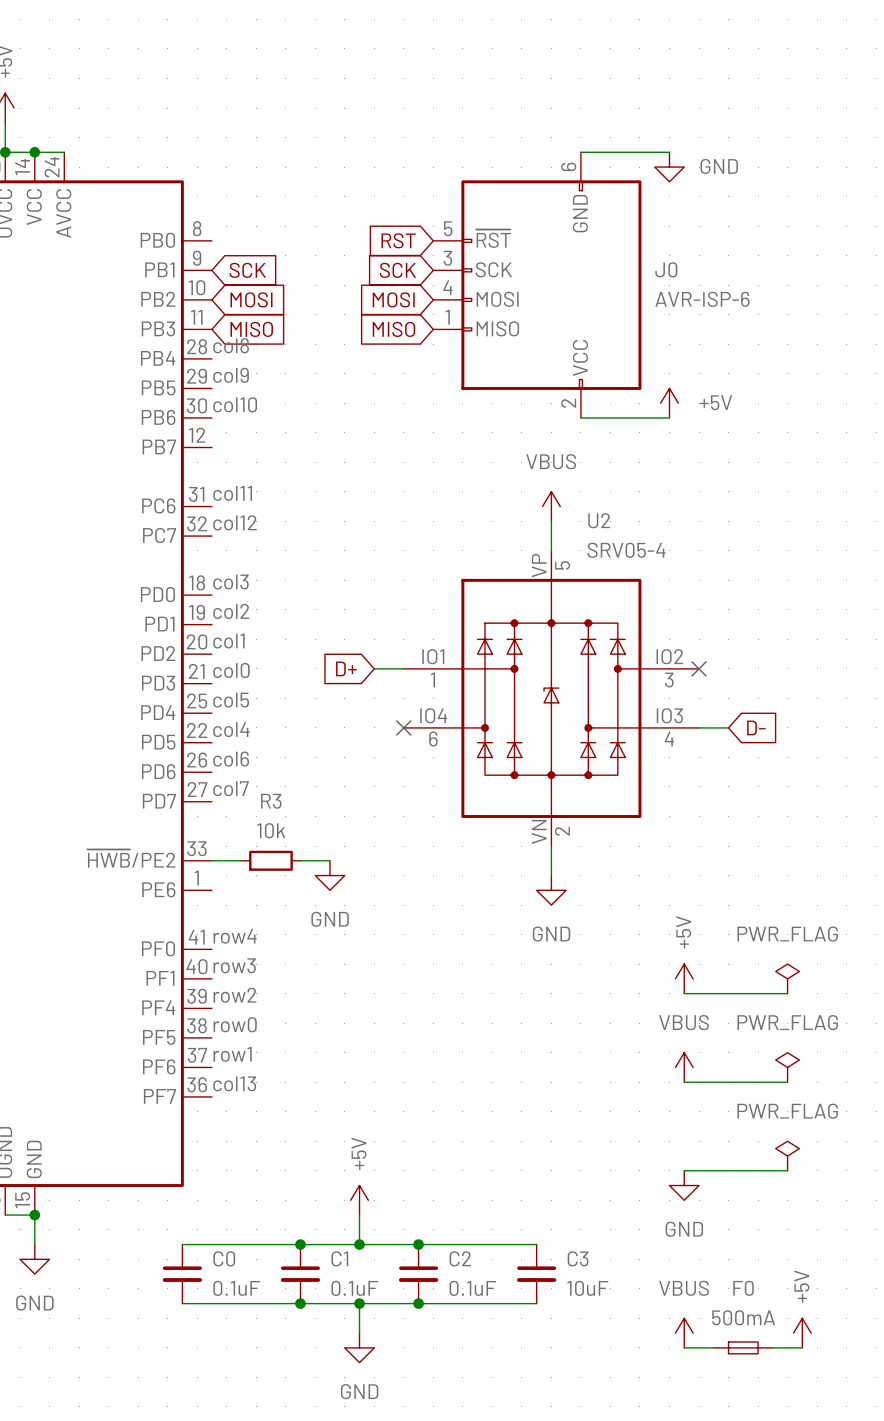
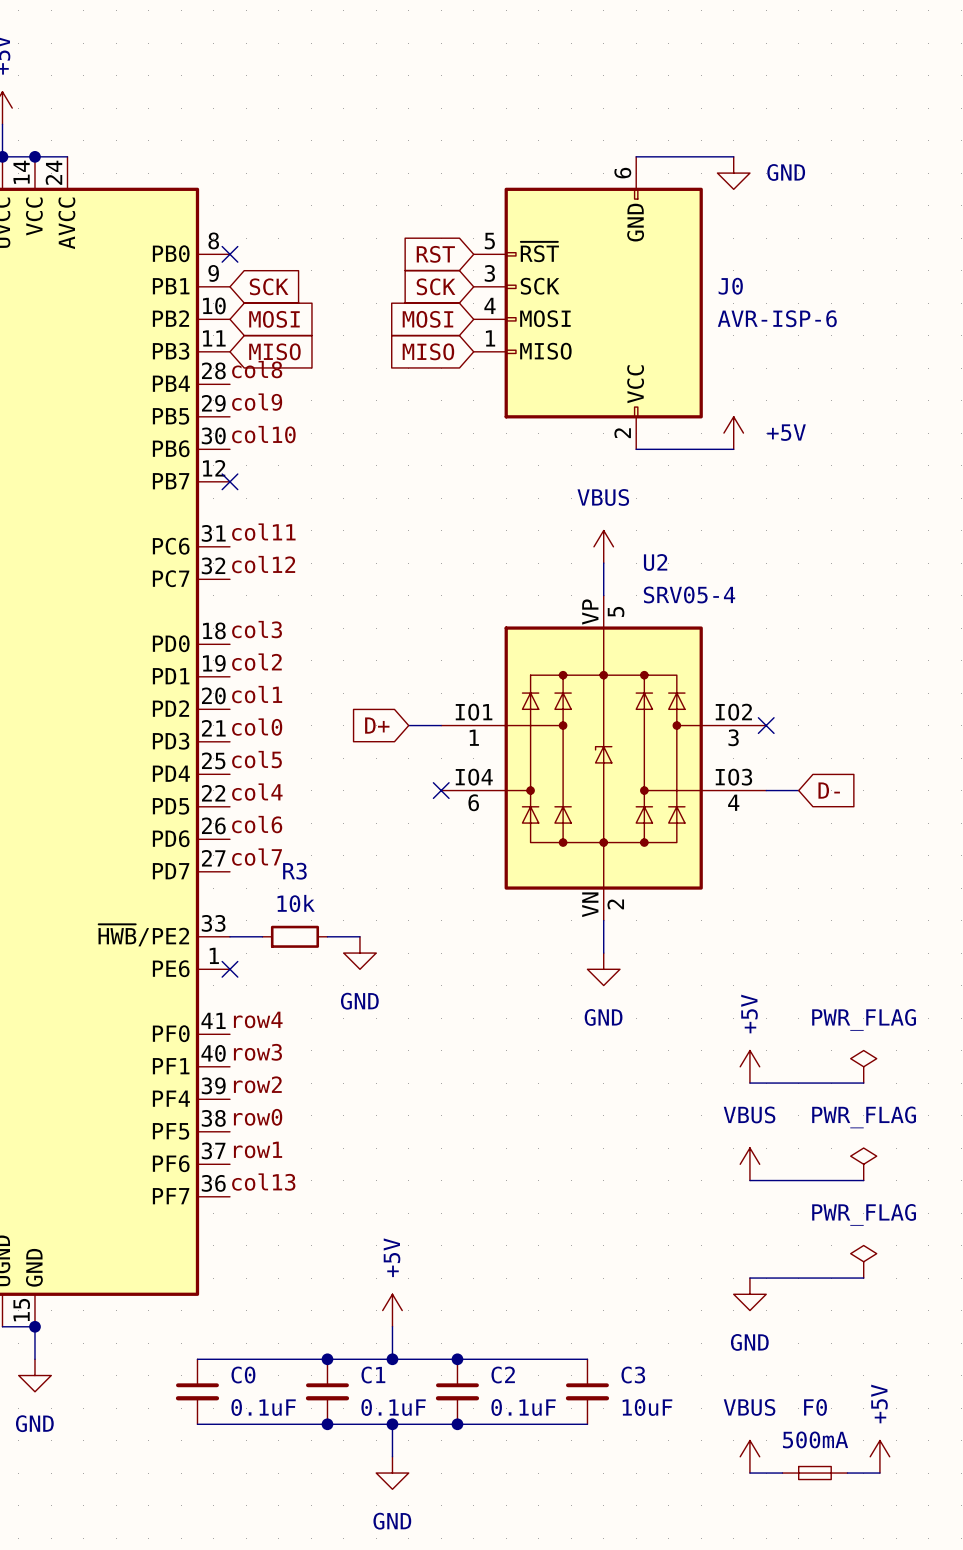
no-connect mark: none -> (229, 254)
no-connect mark: none -> (229, 481)
no-connect mark: none -> (229, 969)

